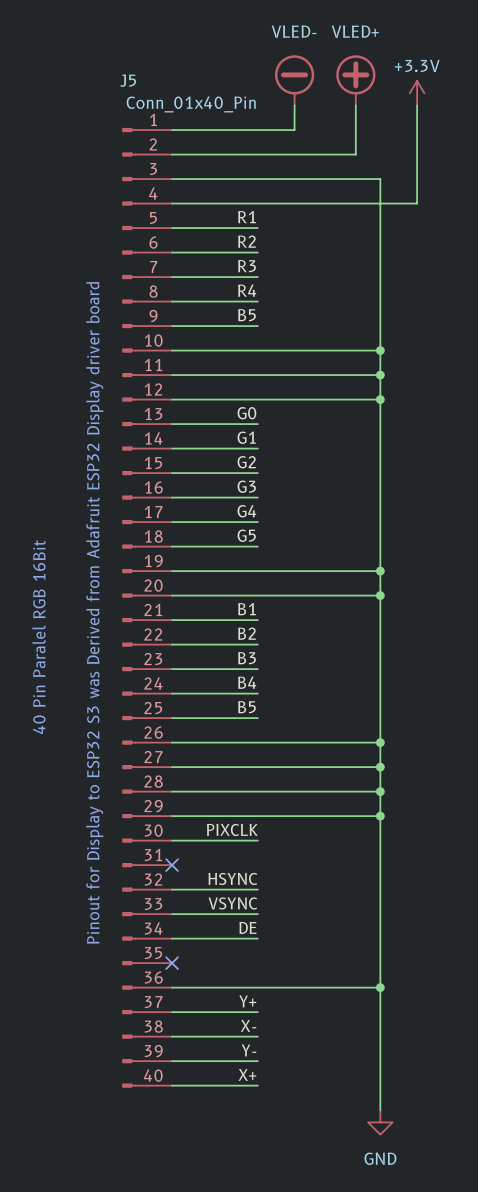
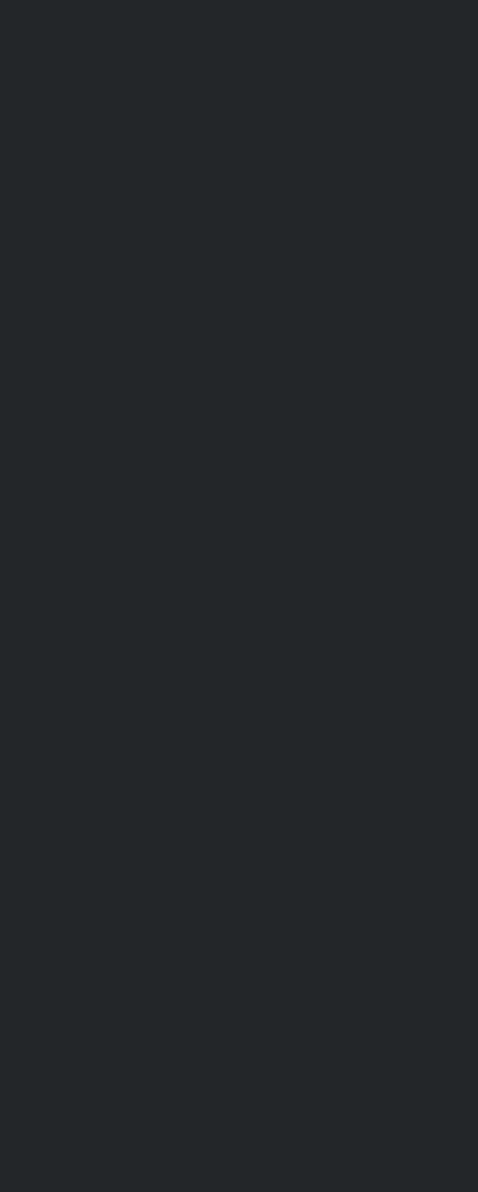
power symbol: VLED- (294, 80) -> none
power symbol: VLED+ (355, 80) -> none
power symbol: +3.3V (417, 93) -> none
wire: (294, 105) (294, 130) (172, 130) -> none
wire: (355, 105) (355, 154) (172, 154) -> none
wire: (417, 105) (417, 203) (172, 203) -> none
wire: (172, 179) (380, 179) (380, 1110) -> none
label: R1 (246, 217) -> none
wire: (172, 228) (257, 228) -> none
label: R2 (246, 241) -> none
wire: (172, 252) (257, 252) -> none
label: R3 (246, 266) -> none
wire: (172, 277) (257, 277) -> none
label: R4 (247, 290) -> none
wire: (172, 301) (257, 301) -> none
label: B5 (246, 315) -> none
wire: (172, 326) (257, 326) -> none
wire: (172, 350) (380, 350) -> none
junction: (380, 350) -> none
wire: (172, 375) (380, 375) -> none
junction: (380, 375) -> none
wire: (172, 399) (380, 399) -> none
junction: (380, 399) -> none
label: G0 (246, 413) -> none
wire: (172, 424) (257, 424) -> none
label: G1 (246, 437) -> none
wire: (172, 448) (257, 448) -> none
label: G2 (246, 462) -> none
wire: (172, 473) (257, 473) -> none
label: G3 (246, 486) -> none
wire: (172, 497) (257, 497) -> none
label: G4 (246, 511) -> none
wire: (172, 522) (257, 522) -> none
label: G5 (246, 535) -> none
wire: (172, 546) (257, 546) -> none
wire: (172, 571) (380, 571) -> none
junction: (380, 571) -> none
wire: (172, 595) (380, 595) -> none
junction: (380, 595) -> none
J5: Conn_01x40_Pin (147, 607) -> none
label: B1 (246, 609) -> none
text: Pinout for Display to ESP32 S3 was Derived from Adafruit ESP32 Display driver board (94, 612) -> none
wire: (172, 620) (257, 620) -> none
label: B2 (247, 633) -> none
text: 40 Pin Paralel RGB 16Bit (38, 637) -> none
wire: (172, 644) (257, 644) -> none
label: B3 (247, 658) -> none
wire: (172, 669) (257, 669) -> none
label: B4 (247, 682) -> none
wire: (172, 693) (257, 693) -> none
label: B5 (246, 707) -> none
wire: (172, 718) (257, 718) -> none
wire: (172, 742) (380, 742) -> none
junction: (380, 742) -> none
wire: (172, 767) (380, 767) -> none
junction: (380, 767) -> none
wire: (172, 791) (380, 791) -> none
junction: (380, 791) -> none
wire: (172, 816) (380, 816) -> none
junction: (380, 816) -> none
label: PIXCLK (232, 829) -> none
wire: (172, 840) (257, 840) -> none
no-connect mark: (172, 865) -> none
label: HSYNC (232, 878) -> none
wire: (172, 889) (257, 889) -> none
label: VSYNC (232, 903) -> none
wire: (172, 914) (257, 914) -> none
label: DE (248, 927) -> none
wire: (172, 938) (257, 938) -> none
no-connect mark: (172, 963) -> none
wire: (172, 987) (380, 987) -> none
junction: (380, 987) -> none
label: Y+ (247, 1001) -> none
wire: (172, 1012) (257, 1012) -> none
label: X- (248, 1025) -> none
wire: (172, 1036) (257, 1036) -> none
label: Y- (248, 1050) -> none
wire: (172, 1061) (257, 1061) -> none
label: X+ (247, 1074) -> none
wire: (172, 1085) (257, 1085) -> none
power symbol: GND (380, 1122) -> none

